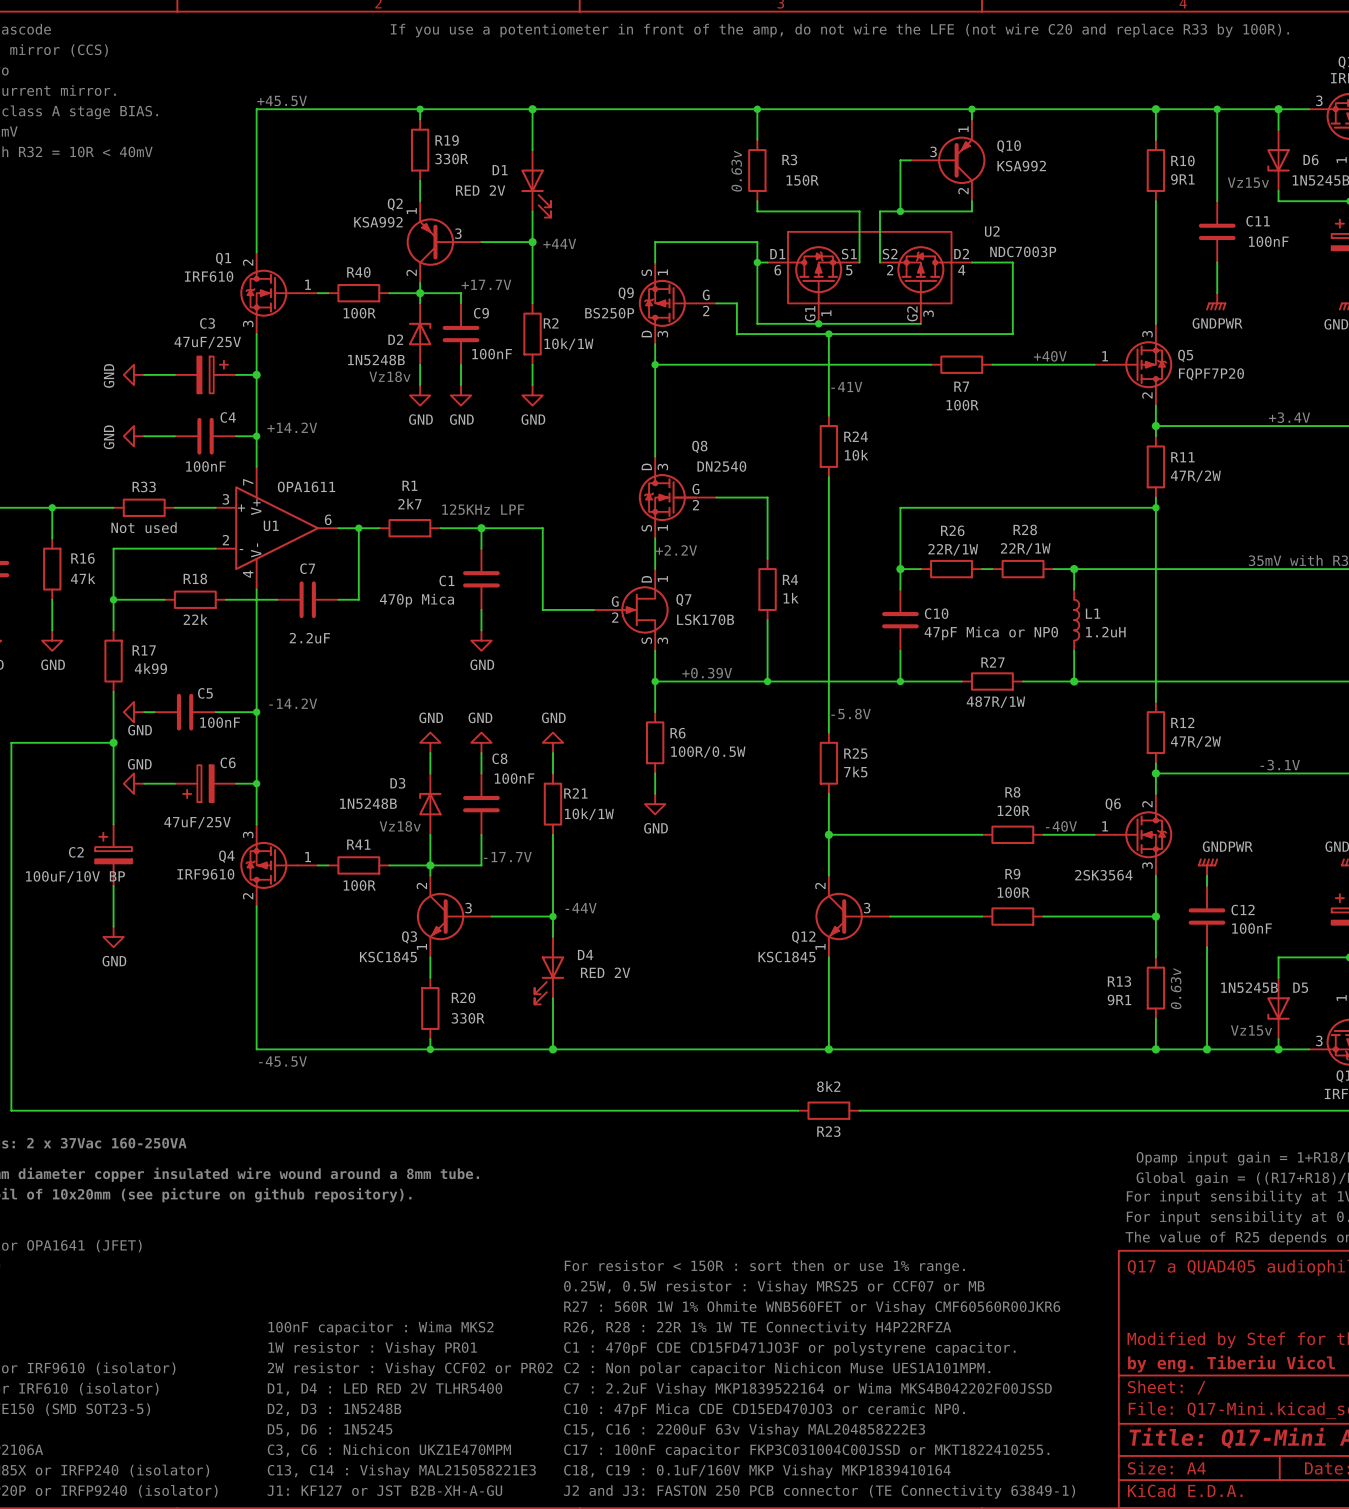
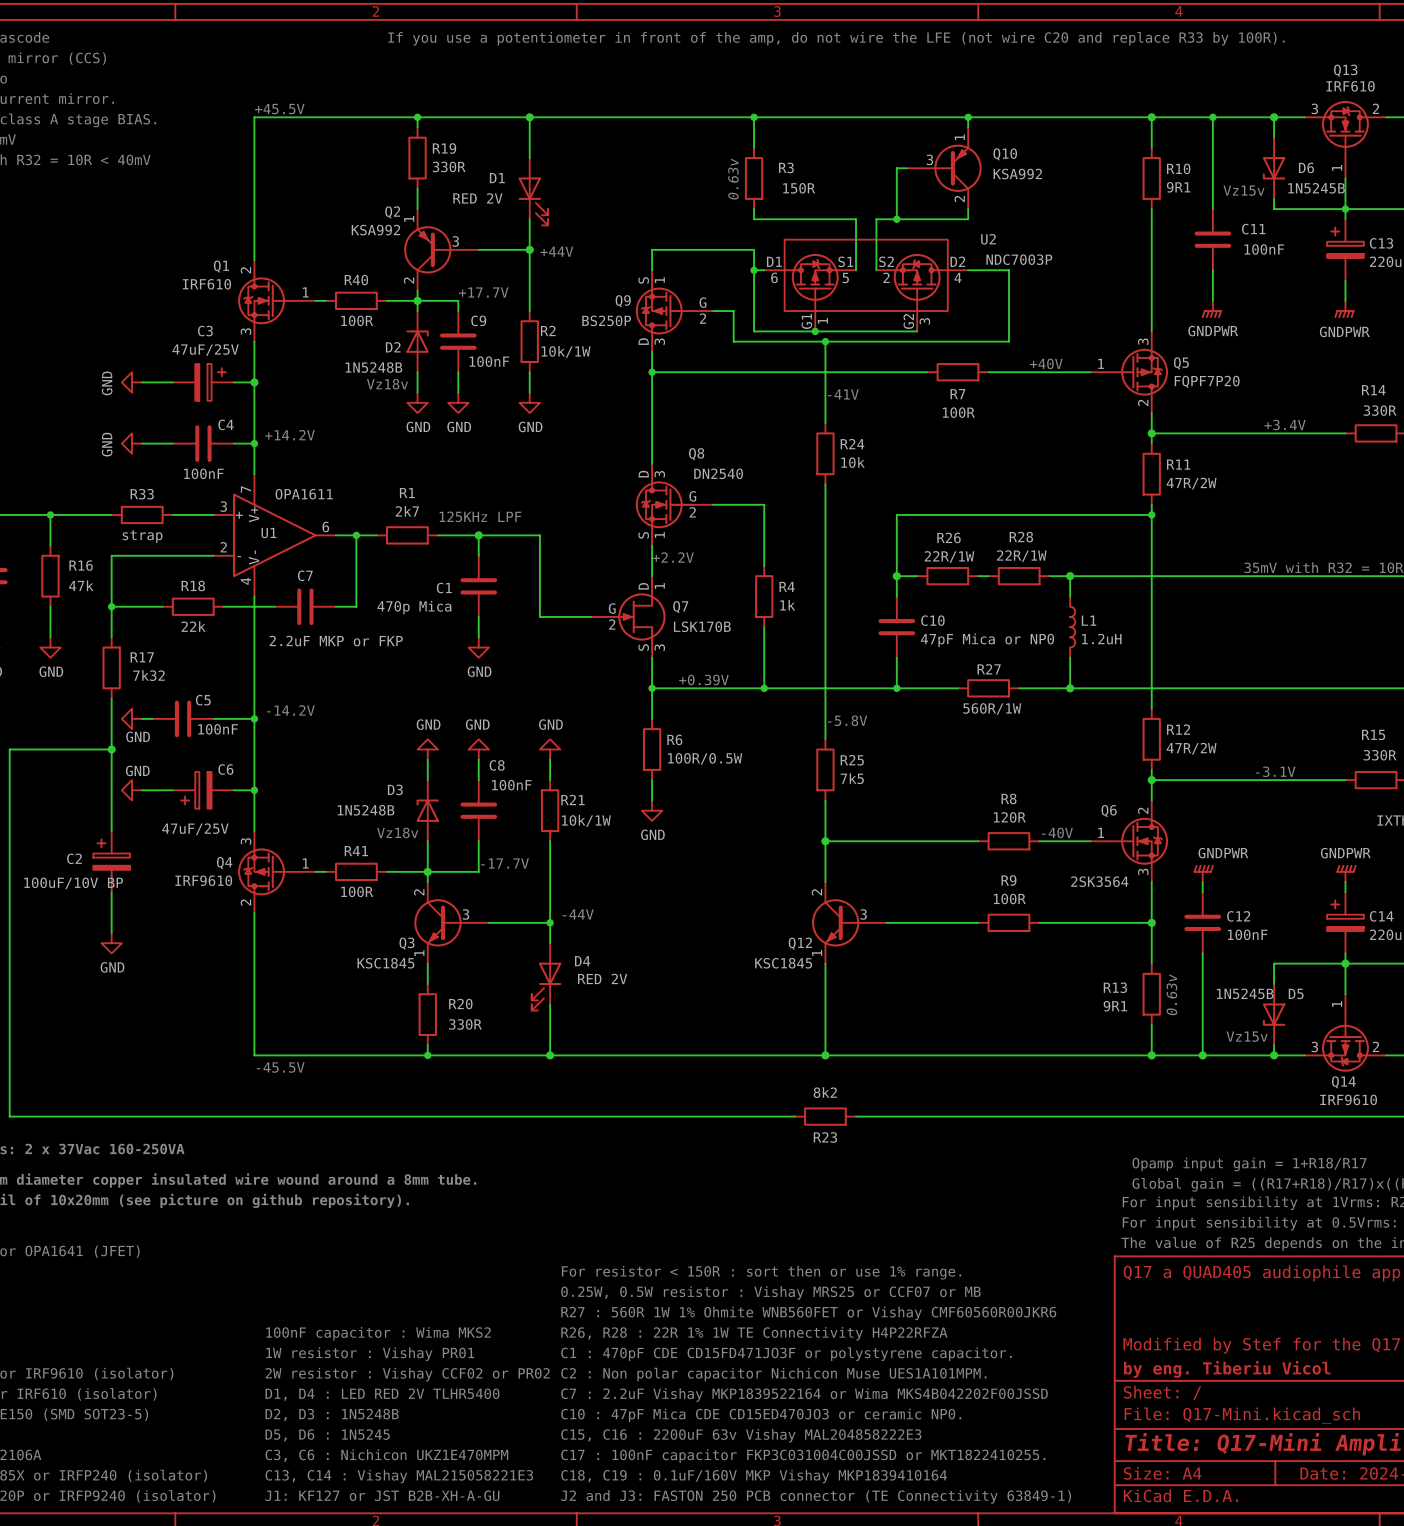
R33 value: Not used (144, 527) -> strap (142, 536)
C7 value: 2.2uF (309, 638) -> 2.2uF MKP or FKP (336, 641)
R17 value: 4k99 (150, 668) -> 7k32 (148, 675)
R27 value: 487R/1W (995, 702) -> 560R/1W (992, 709)

